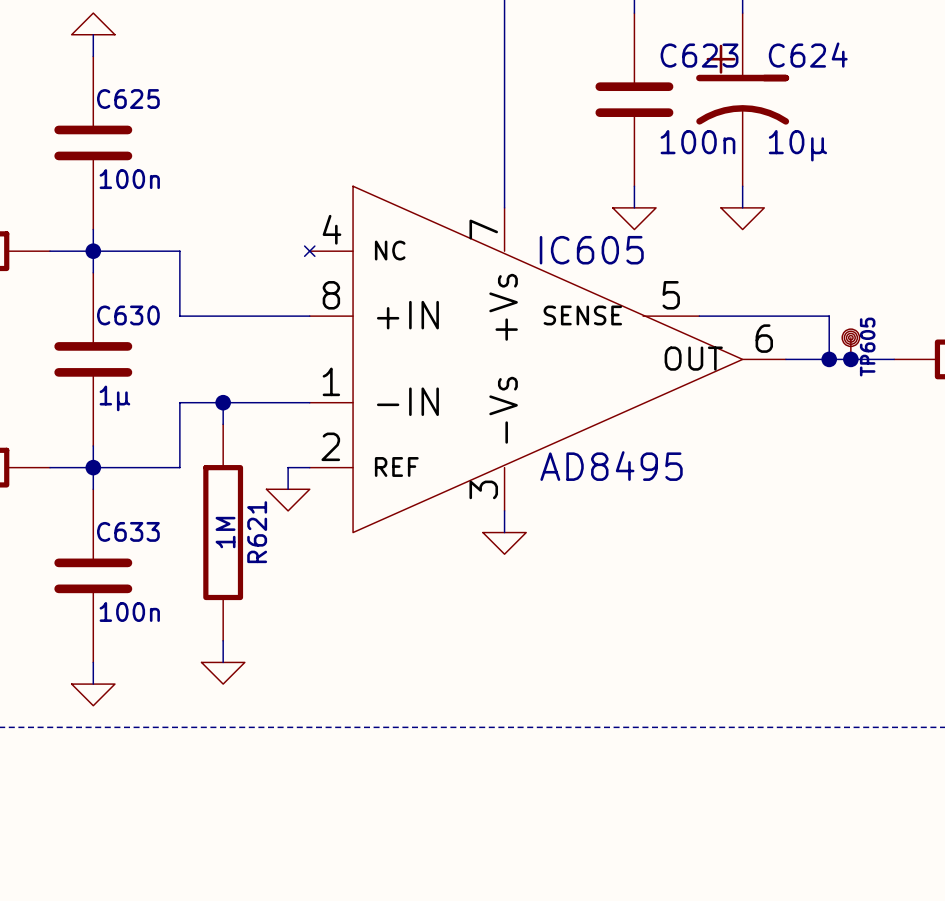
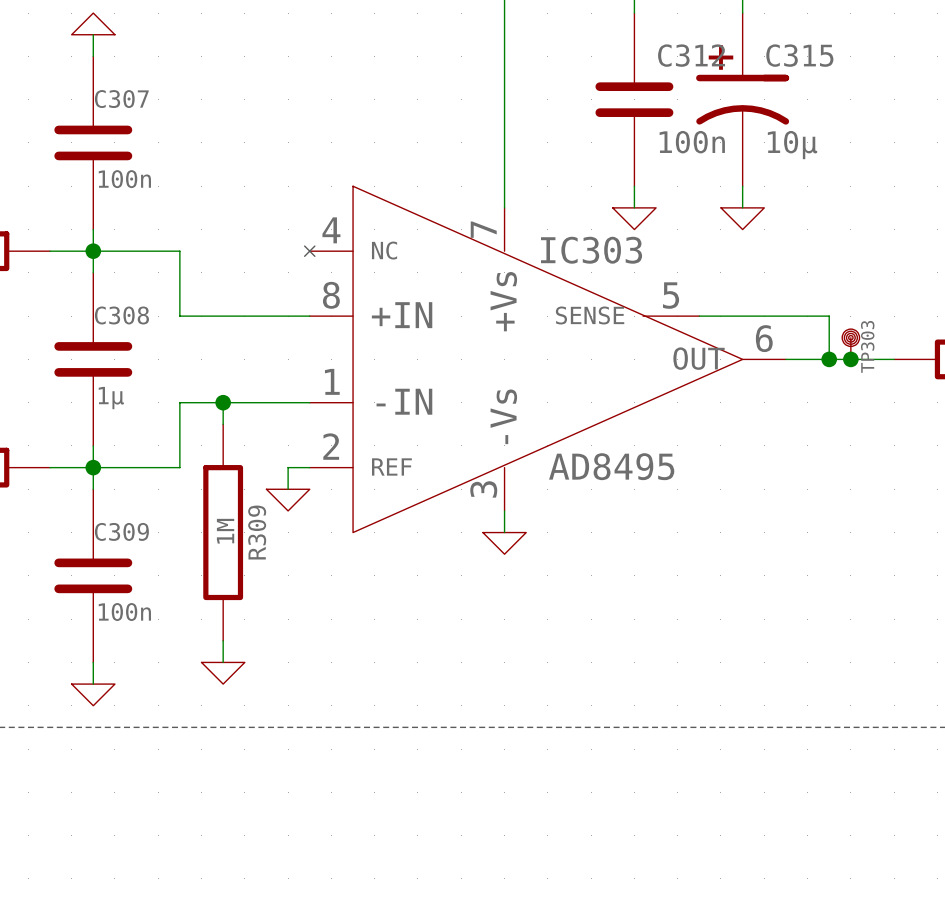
C623 name: C623 (699, 55) -> C312 (691, 55)
C624 name: C624 (808, 55) -> C315 (799, 55)
C625 name: C625 (128, 99) -> C307 (121, 99)
IC605 name: IC605 (591, 250) -> IC303 (591, 250)
C630 name: C630 (128, 315) -> C308 (121, 315)
TP605 name: TP605 (867, 347) -> TP303 (867, 346)
C633 name: C633 (128, 531) -> C309 (121, 531)
R621 name: R621 (257, 532) -> R309 (257, 532)

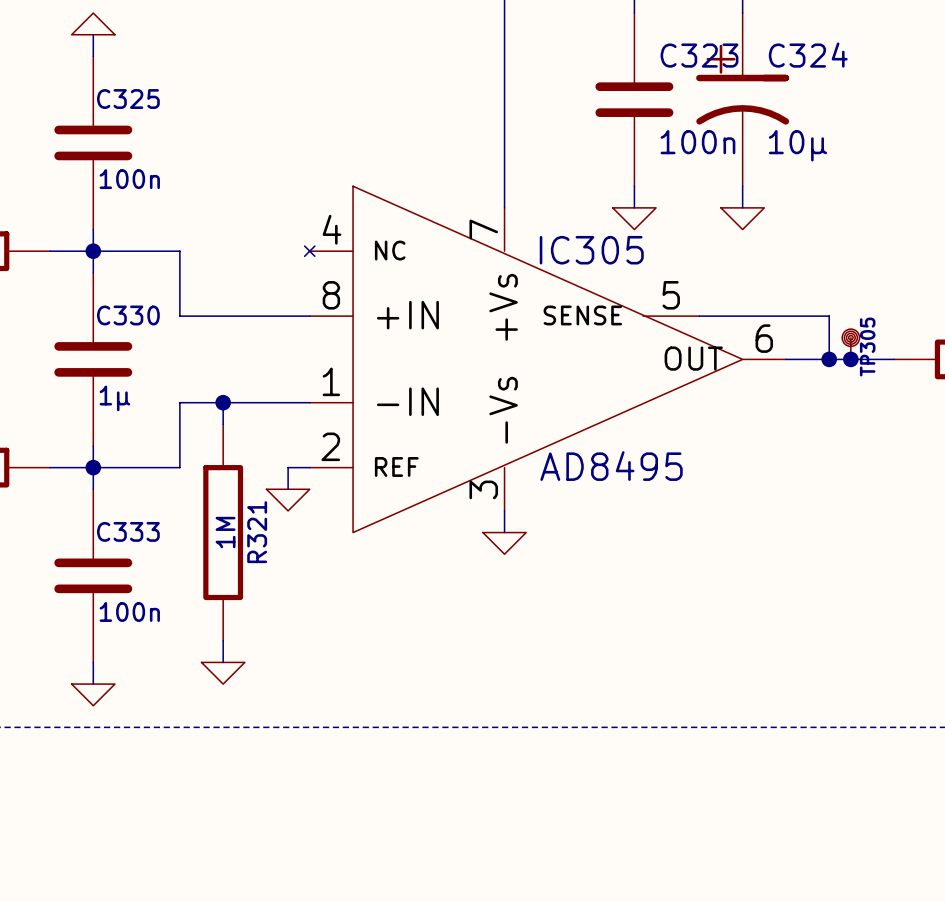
C312 name: C312 (691, 55) -> C323 (699, 55)
C315 name: C315 (799, 55) -> C324 (808, 55)
C307 name: C307 (121, 99) -> C325 (128, 99)
IC303 name: IC303 (591, 250) -> IC305 (591, 250)
C308 name: C308 (121, 315) -> C330 (128, 315)
TP303 name: TP303 (867, 346) -> TP305 (867, 347)
C309 name: C309 (121, 531) -> C333 (128, 531)
R309 name: R309 (257, 532) -> R321 (257, 532)

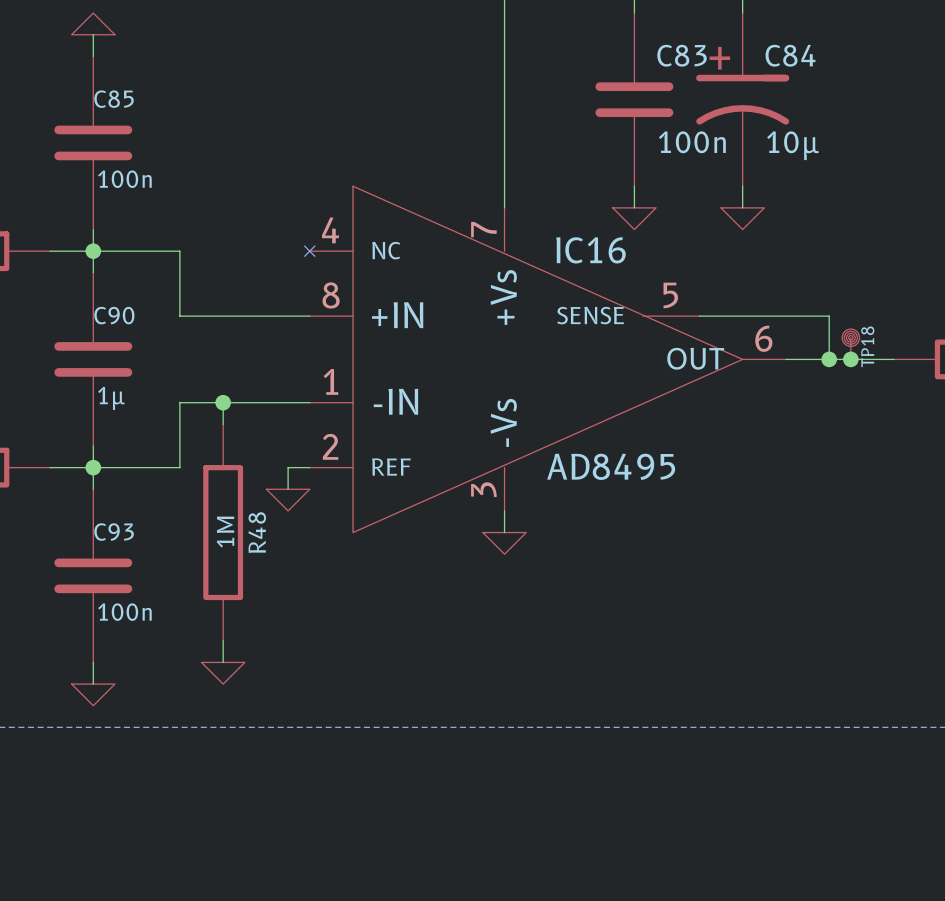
C323 name: C323 (699, 55) -> C83 (682, 55)
C324 name: C324 (808, 55) -> C84 (790, 55)
C325 name: C325 (128, 99) -> C85 (114, 99)
IC305 name: IC305 (591, 250) -> IC16 (591, 250)
C330 name: C330 (128, 315) -> C90 (114, 315)
TP305 name: TP305 (867, 347) -> TP18 (867, 346)
C333 name: C333 (128, 531) -> C93 (114, 532)
R321 name: R321 (257, 532) -> R48 (257, 532)

